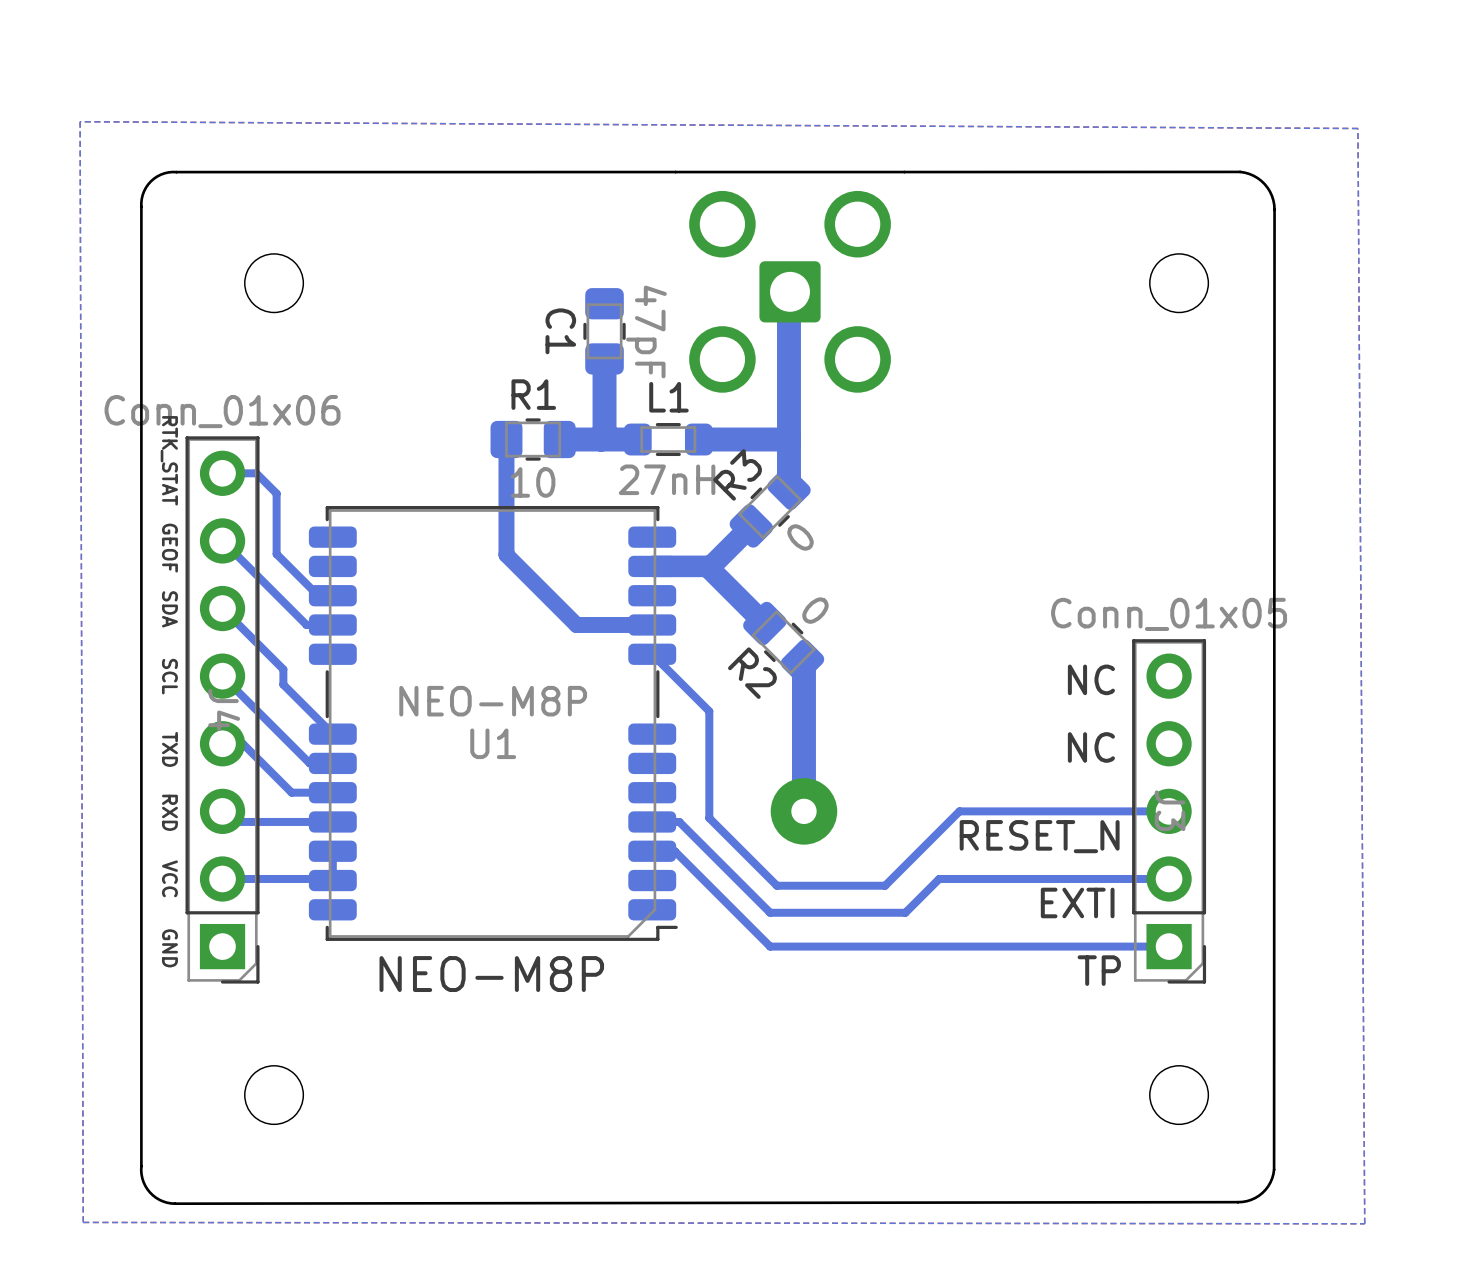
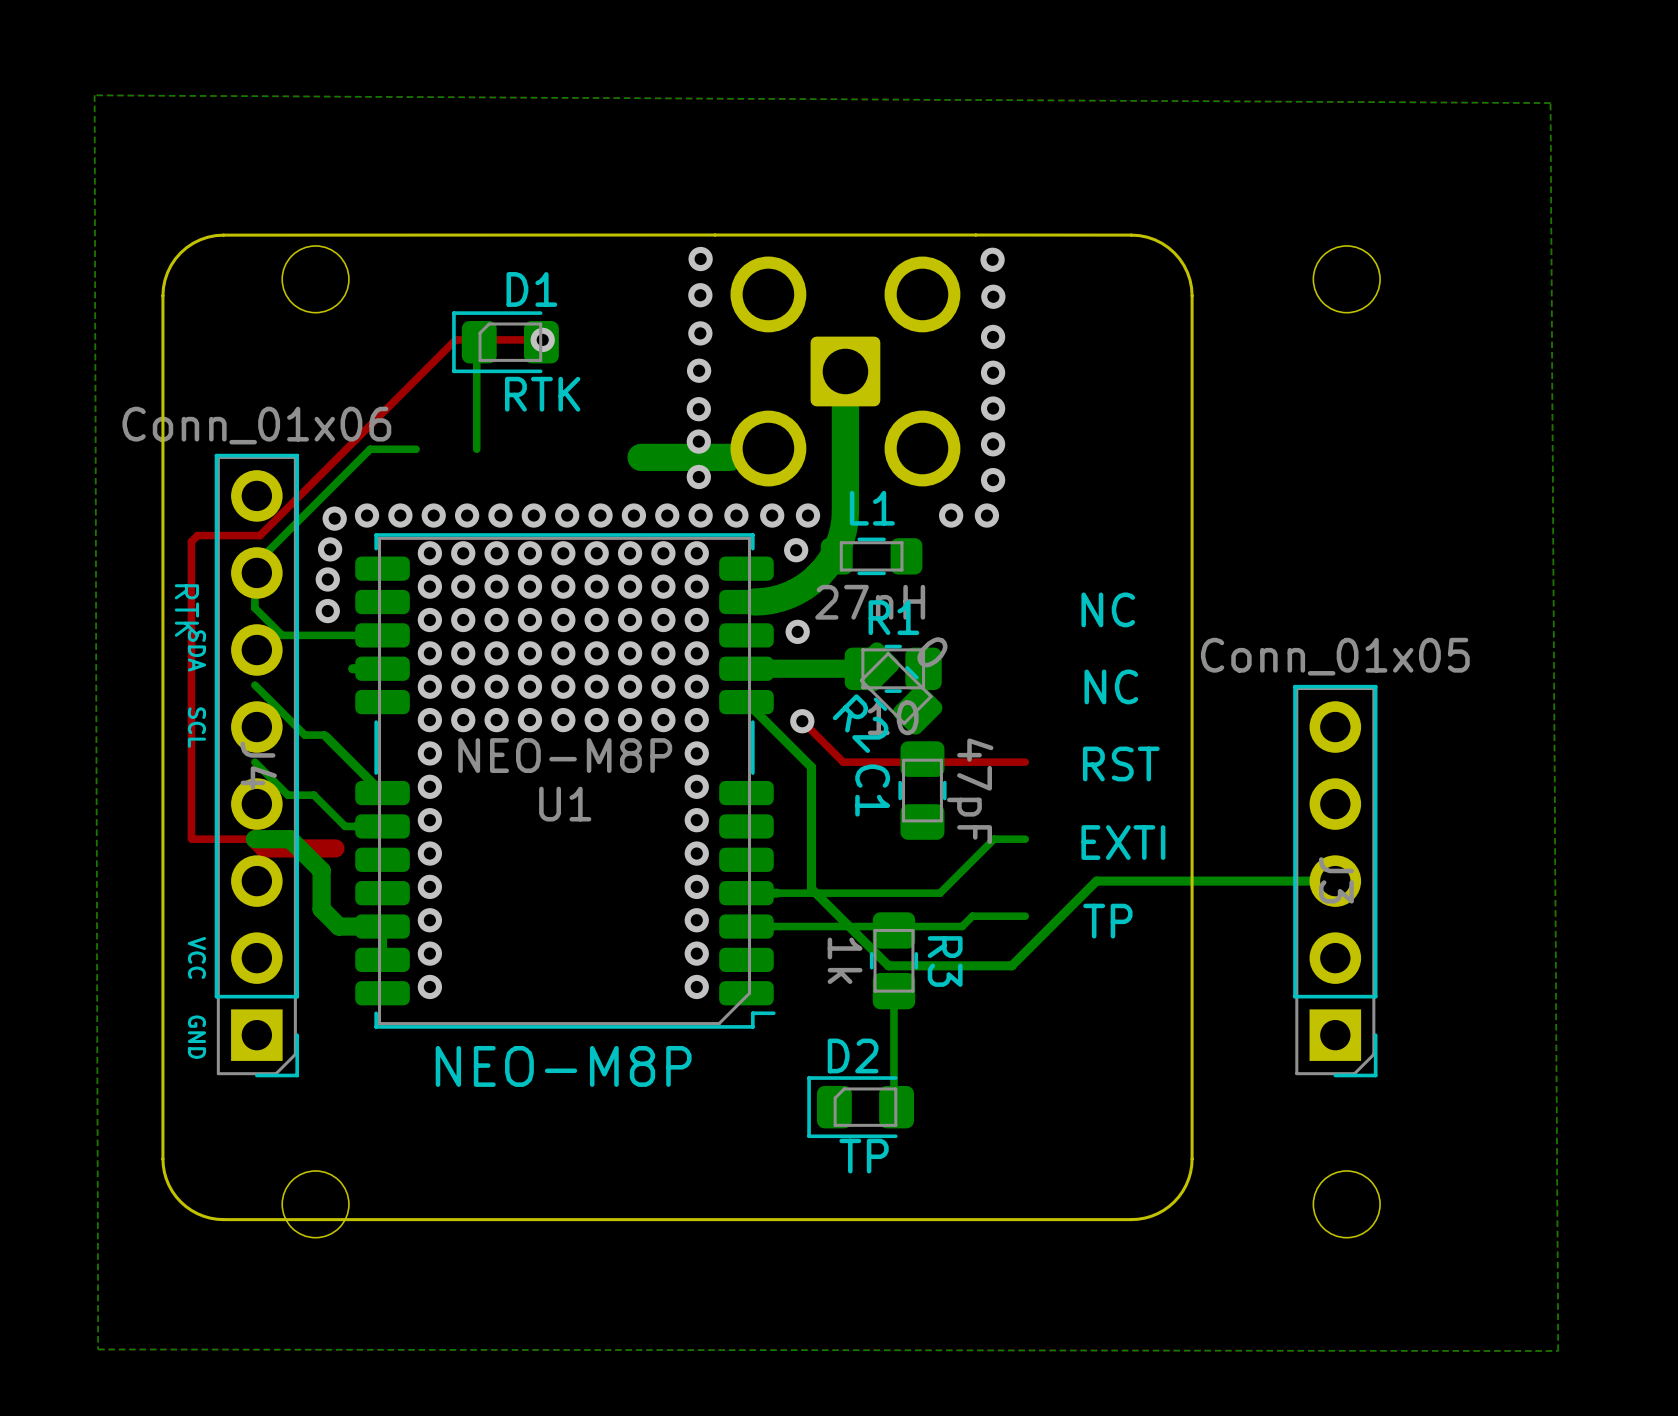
board edge: (904, 172) (1240, 171) (1257, 178) (1264, 184) (1271, 195) (1274, 209) (1274, 1169) (1268, 1186) (1255, 1198) (1238, 1202) (175, 1203) (159, 1199) (147, 1189) (141, 1170) (141, 202) (144, 191) (157, 176) (172, 172) (675, 172) -> none
board edge: none -> (975, 235) (1131, 235) (1147, 237) (1161, 243) (1174, 252) (1183, 265) (1190, 280) (1192, 295) (1192, 1158) (1188, 1179) (1178, 1196) (1169, 1206) (1157, 1213) (1144, 1218) (1131, 1219) (223, 1219) (210, 1218) (197, 1213) (185, 1206) (172, 1191) (166, 1179) (162, 1158) (162, 295) (165, 280) (171, 265) (180, 252) (193, 243) (207, 237) (223, 235) (715, 235)
via: none -> (700, 259)
via: none -> (992, 259)
part position: (790, 281) -> (845, 359)
bottom track: (788, 292) (788, 488) -> none
via: none -> (700, 295)
via: none -> (993, 296)
via: none -> (700, 333)
C1 position: (604, 331) -> (922, 790)
via: none -> (993, 336)
top track: none -> (542, 339) (455, 339) (259, 535) (197, 535) (191, 541) (191, 838) (254, 839) (264, 848) (335, 848)
via: none -> (542, 339)
bottom track: none -> (479, 342) (476, 344) (476, 449)
D1: none -> RTK (505, 342)
bottom track: (604, 358) (604, 436) (601, 439) -> none
via: none -> (699, 370)
via: none -> (993, 372)
via: none -> (993, 408)
via: none -> (698, 409)
via: none -> (698, 441)
via: none -> (993, 444)
bottom track: (506, 439) (506, 554) (576, 624) (652, 624) -> (862, 668) (746, 668)
R1 position: (533, 439) -> (893, 668)
L1 position: (668, 439) -> (871, 556)
bottom track: (788, 439) (698, 439) -> none
via: none -> (698, 477)
via: none -> (993, 480)
text: RTK_STAT (169, 460) -> none
bottom track: (222, 473) (256, 473) (276, 493) (276, 554) (318, 595) -> (416, 449) (370, 449) (254, 564) (254, 608) (282, 635) (365, 635)
R3 name position: R3 (737, 474) -> R3 (945, 961)
via: none -> (367, 515)
via: none -> (400, 515)
via: none -> (433, 515)
via: none -> (467, 515)
via: none -> (500, 515)
via: none -> (533, 515)
via: none -> (567, 515)
via: none -> (600, 515)
via: none -> (633, 515)
via: none -> (667, 515)
via: none -> (700, 515)
via: none -> (736, 515)
via: none -> (772, 515)
via: none -> (807, 515)
via: none -> (951, 515)
via: none -> (986, 515)
via: none -> (334, 518)
R3 rotation: 0° (770, 507) -> 45° counterclockwise (893, 960)
R3 position: (770, 507) -> (893, 960)
via: none -> (330, 549)
via: none -> (796, 550)
via: none -> (429, 553)
via: none -> (463, 553)
via: none -> (496, 553)
via: none -> (529, 553)
via: none -> (563, 553)
via: none -> (596, 553)
via: none -> (630, 553)
via: none -> (663, 553)
via: none -> (696, 553)
bottom track: (751, 525) (710, 566) (659, 566) -> (845, 371) (845, 510) (843, 528) (838, 545) (824, 568) (804, 586) (780, 598) (754, 602)
R3 value: 0 (800, 537) -> 1k (845, 960)
bottom track: (222, 540) (306, 624) -> none
via: none -> (327, 579)
text: GEOF (169, 548) -> none
via: none -> (429, 586)
via: none -> (463, 586)
via: none -> (496, 586)
via: none -> (529, 586)
via: none -> (563, 586)
via: none -> (596, 586)
via: none -> (630, 586)
via: none -> (663, 586)
via: none -> (696, 586)
bottom track: (707, 566) (764, 623) -> none
text: none -> RTK (186, 610)
text: none -> NC (1108, 609)
via: none -> (327, 611)
via: none -> (429, 620)
via: none -> (463, 620)
via: none -> (496, 620)
via: none -> (529, 620)
via: none -> (563, 620)
via: none -> (596, 620)
via: none -> (630, 620)
via: none -> (663, 620)
via: none -> (696, 620)
via: none -> (797, 631)
bottom track: (222, 608) (283, 669) (283, 684) -> (254, 685) (304, 735) (324, 735) (326, 736)
via: none -> (429, 653)
via: none -> (463, 653)
via: none -> (496, 653)
via: none -> (529, 653)
via: none -> (563, 653)
via: none -> (596, 653)
via: none -> (630, 653)
via: none -> (663, 653)
via: none -> (696, 653)
via: none -> (429, 686)
via: none -> (463, 686)
via: none -> (496, 686)
via: none -> (529, 686)
via: none -> (563, 686)
via: none -> (596, 686)
via: none -> (630, 686)
via: none -> (663, 686)
via: none -> (696, 686)
text: none -> NC (1111, 686)
bottom track: (802, 661) (803, 811) -> none
via: none -> (429, 720)
via: none -> (463, 720)
via: none -> (496, 720)
via: none -> (529, 720)
via: none -> (563, 720)
via: none -> (596, 720)
via: none -> (630, 720)
via: none -> (663, 720)
via: none -> (696, 720)
top track: none -> (802, 721) (843, 762) (1025, 762)
via: none -> (802, 721)
bottom track: (222, 676) (309, 763) -> (254, 762) (287, 795) (313, 795) (345, 826) (356, 826)
text: NC (1091, 679) -> none
via: none -> (429, 753)
via: none -> (696, 753)
text: none -> RST (1121, 763)
via: none -> (429, 786)
via: none -> (696, 786)
bottom track: (222, 743) (242, 743) (291, 792) (332, 792) -> none
text: NC (1091, 747) -> none
text: TXD (169, 749) -> none
via: none -> (429, 820)
via: none -> (696, 820)
bottom track: none -> (254, 839) (290, 839) (321, 870) (321, 909) (338, 926) (382, 926)
via: none -> (429, 853)
via: none -> (696, 853)
bottom track: (222, 811) (233, 821) (332, 821) -> none
part: (803, 811) -> none
text: RXD (169, 812) -> none
via: none -> (429, 886)
via: none -> (696, 886)
bottom track: (679, 821) (770, 912) (905, 912) (939, 878) (1169, 878) -> (777, 893) (940, 893) (994, 839) (1025, 839)
text: RESET_N (1039, 836) -> none
via: none -> (429, 920)
via: none -> (696, 920)
bottom track: (674, 851) (770, 946) (1169, 946) -> (772, 926) (962, 926) (972, 916) (1025, 916)
via: none -> (429, 953)
via: none -> (696, 953)
bottom track: (222, 878) (331, 878) (332, 880) -> none
text position: EXTI (1077, 902) -> EXTI (1123, 842)
via: none -> (429, 986)
via: none -> (696, 986)
bottom track: none -> (893, 991) (893, 1104) (896, 1107)
text position: TP (1099, 970) -> TP (1107, 921)
D2: none -> TP (860, 1107)

